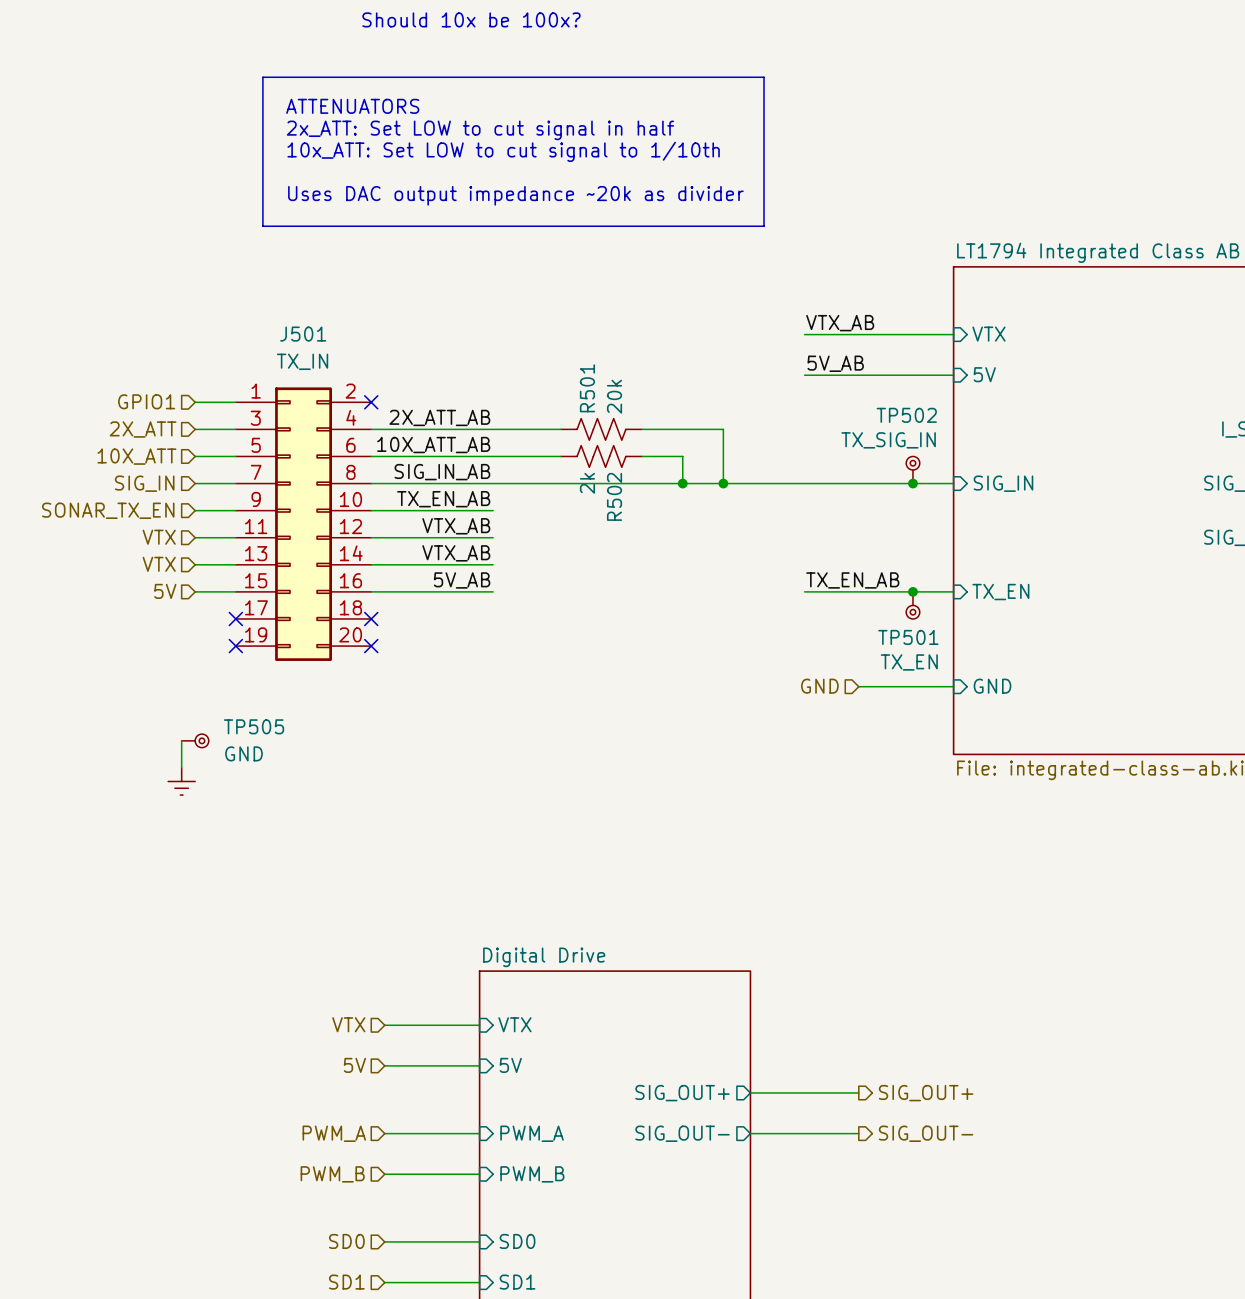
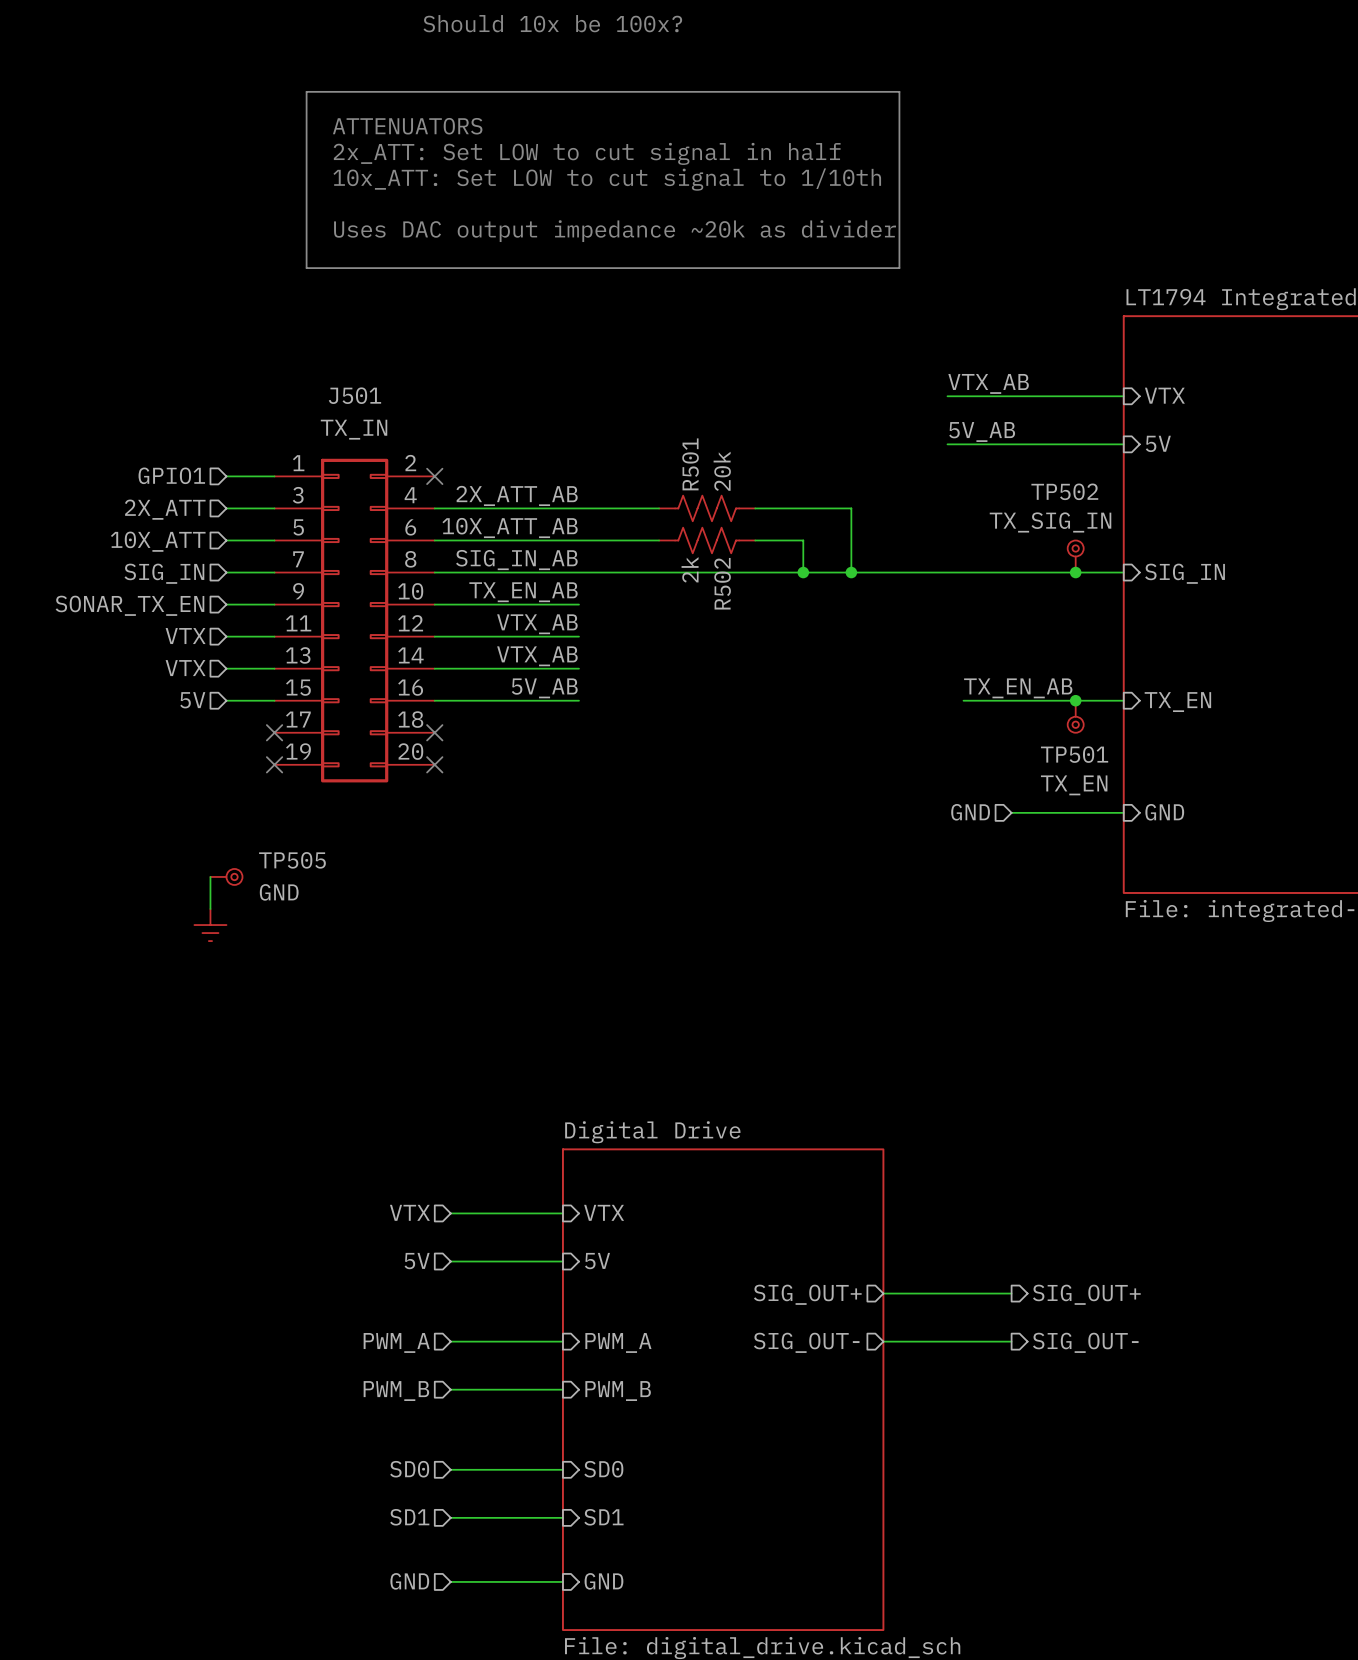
label position: TX_EN_AB (852, 580) -> TX_EN_AB (1018, 688)
wire: (804, 591) (818, 591) -> none

